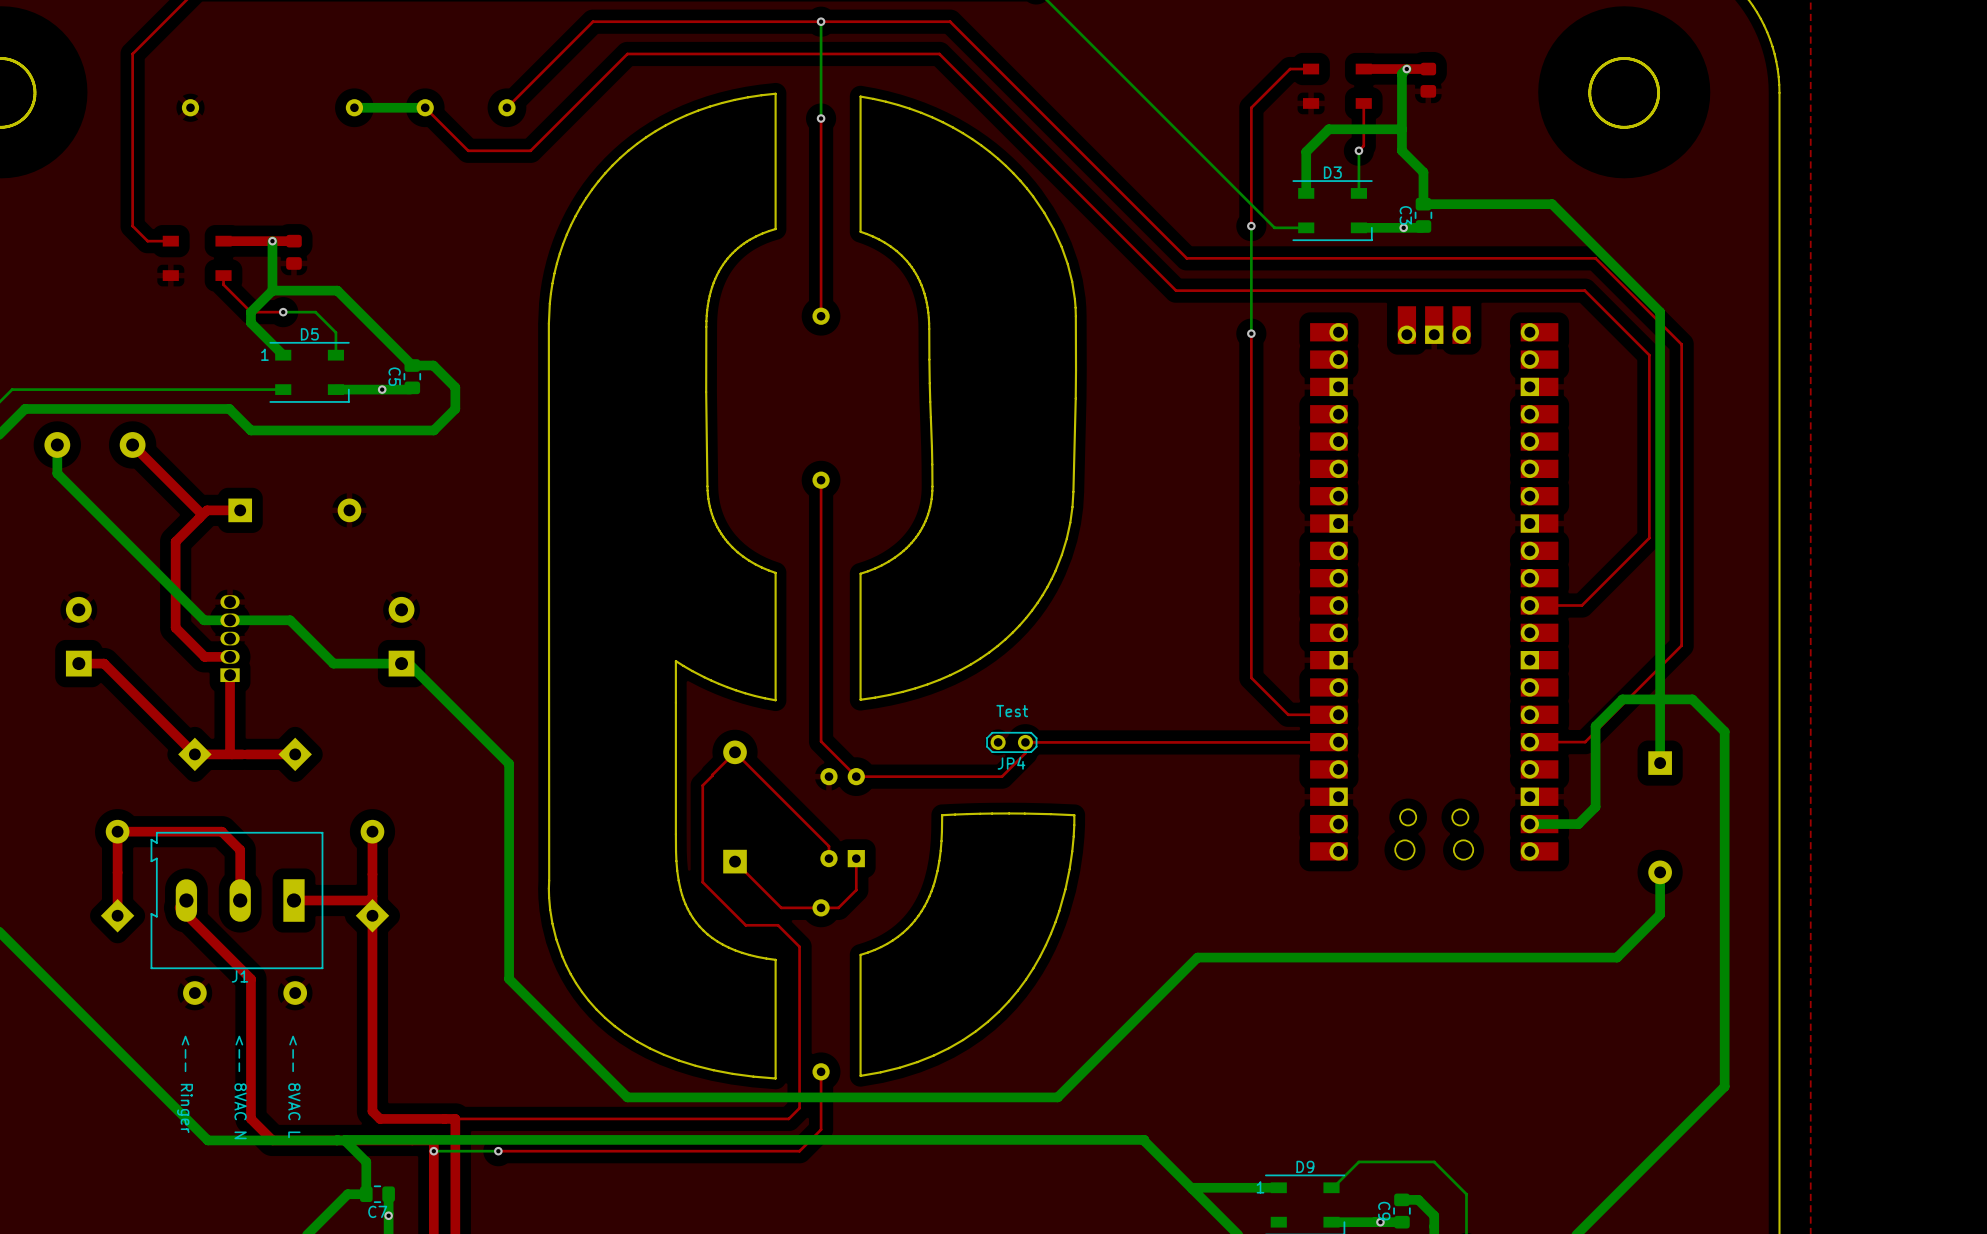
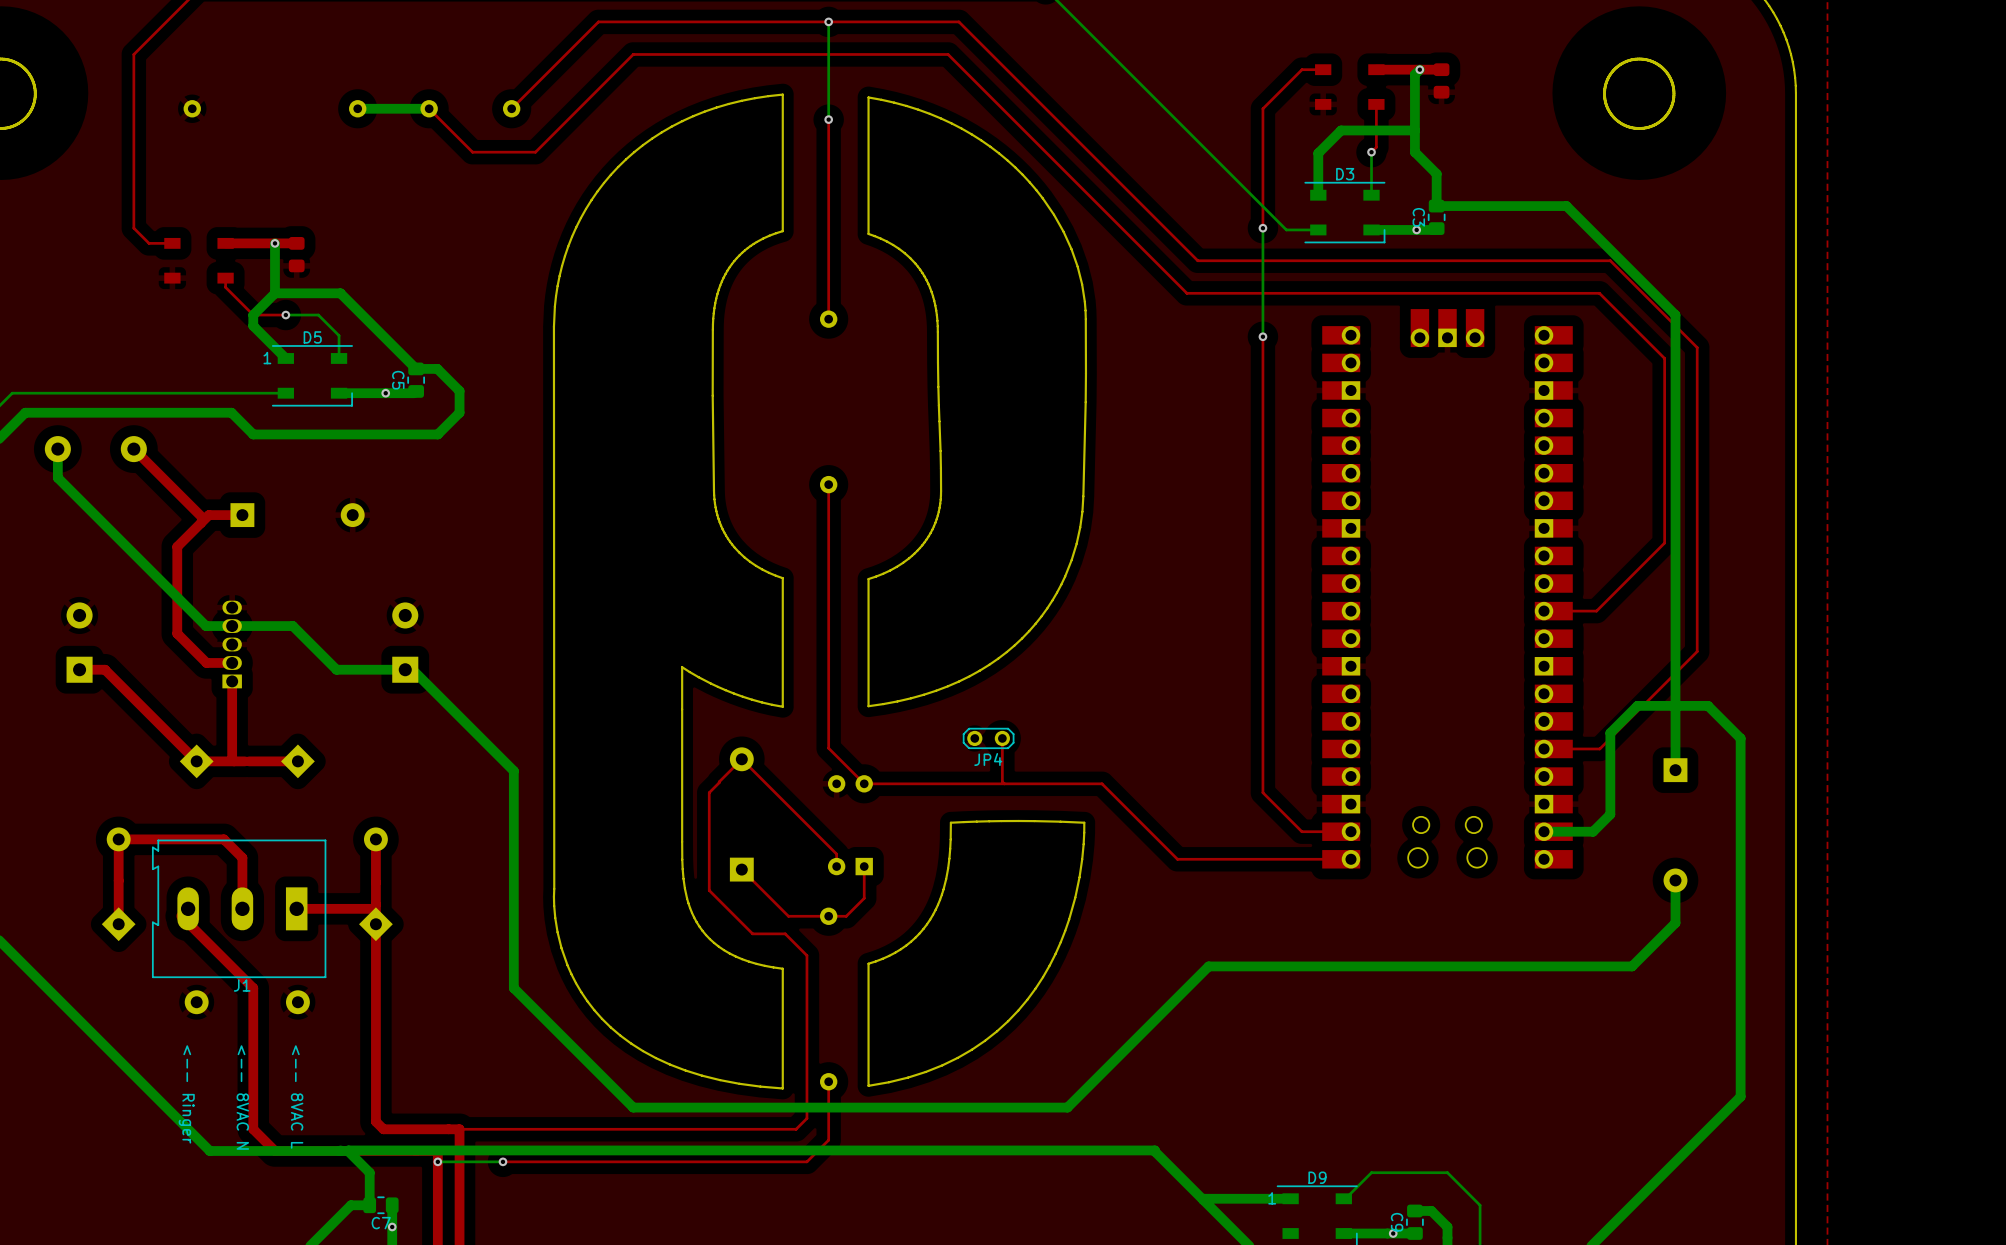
top track: (1251, 677) (1288, 714) (1338, 714) -> (1262, 684) (1262, 792) (1301, 831) (1350, 831)
text: Test (1012, 711) -> none
top track: none -> (1002, 738) (1002, 781) (1004, 783)
JP4 position: (1011, 742) -> (988, 738)
top track: (1338, 742) (1025, 742) (1025, 753) (1002, 776) -> (1350, 859) (1177, 859) (1102, 783) (1011, 783)

